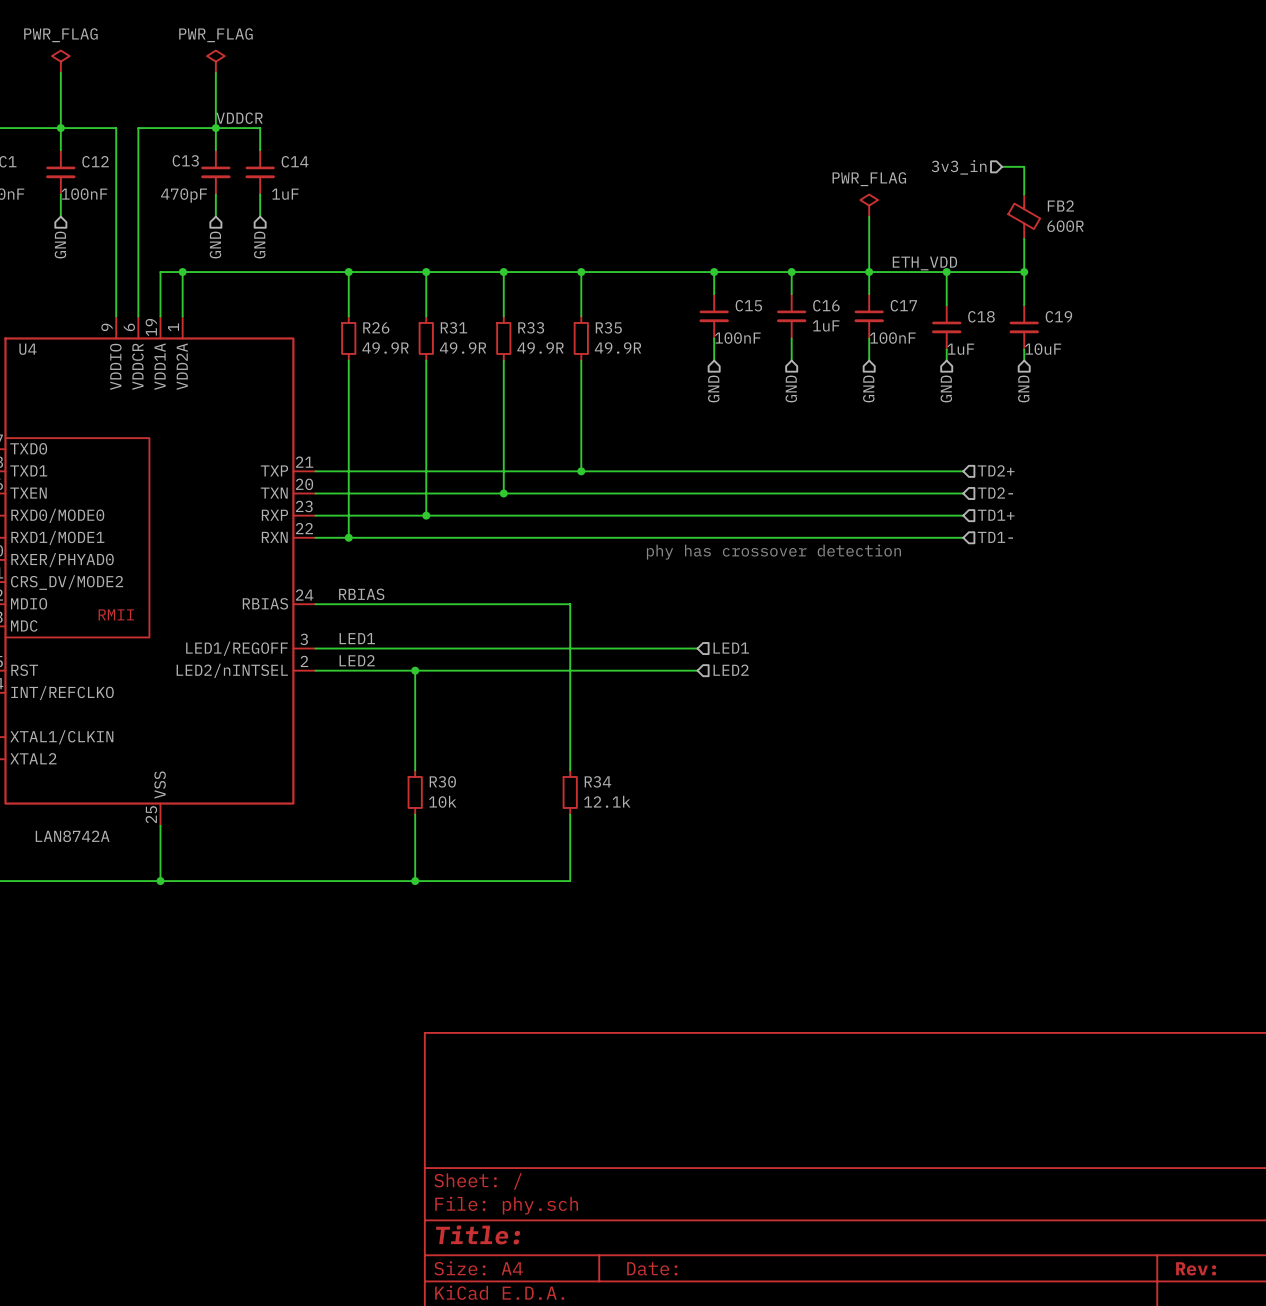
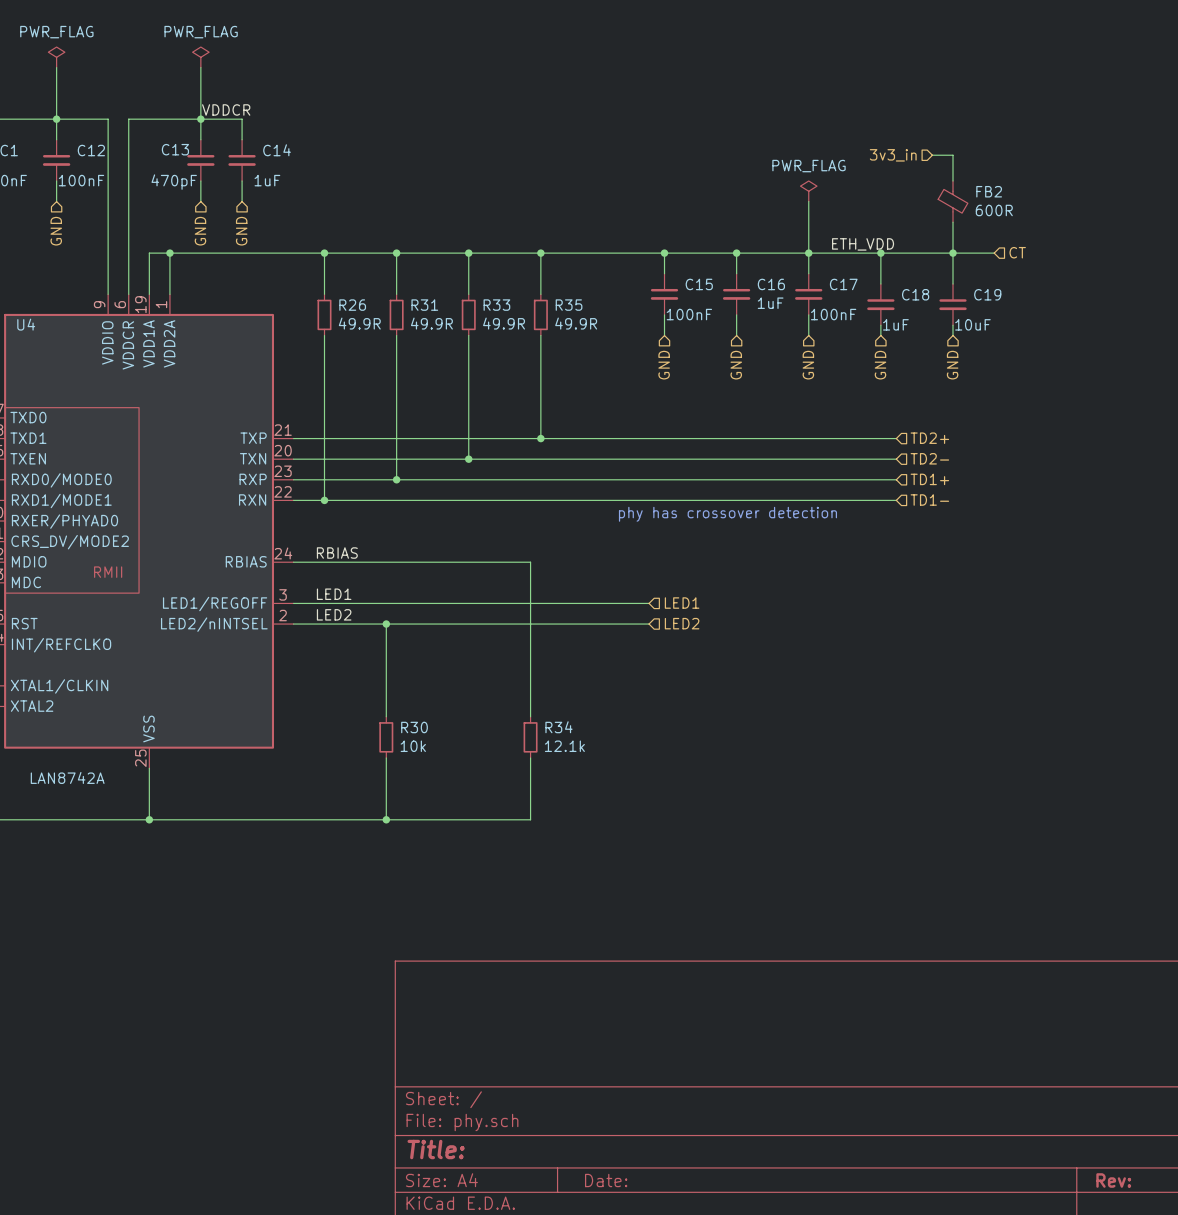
hierarchical label: none -> CT (1017, 252)
wire: none -> (953, 253) (994, 253)

